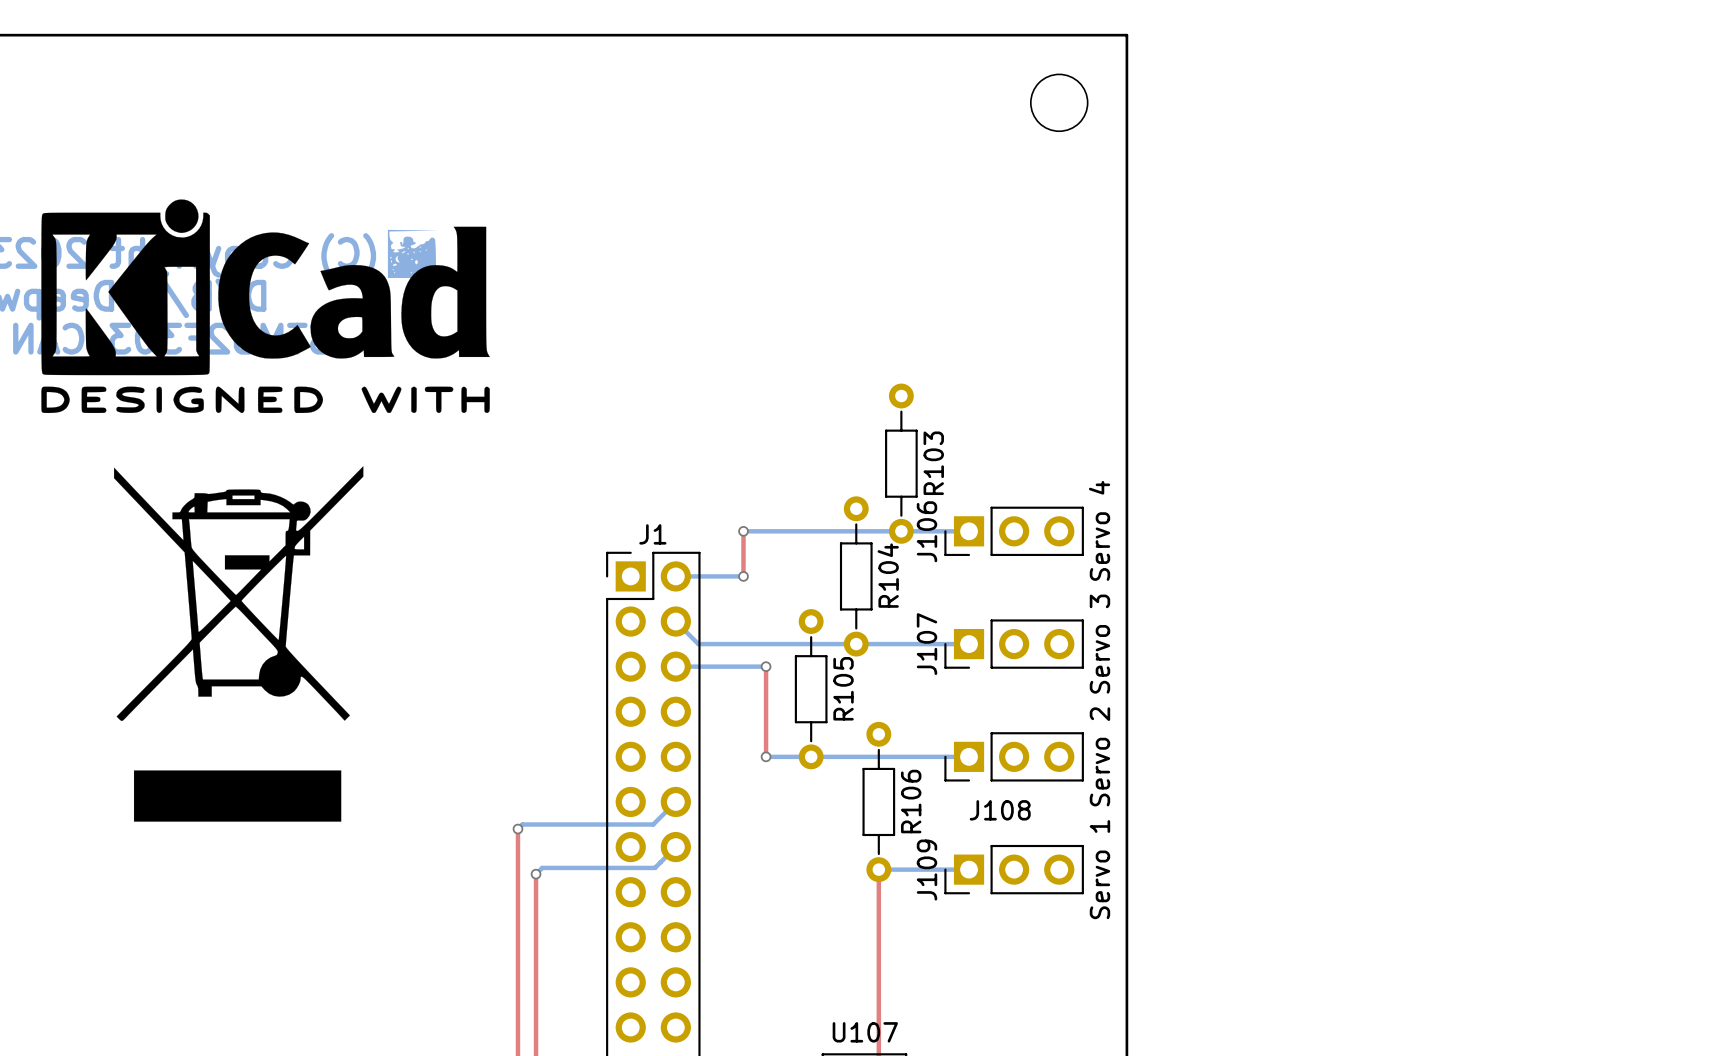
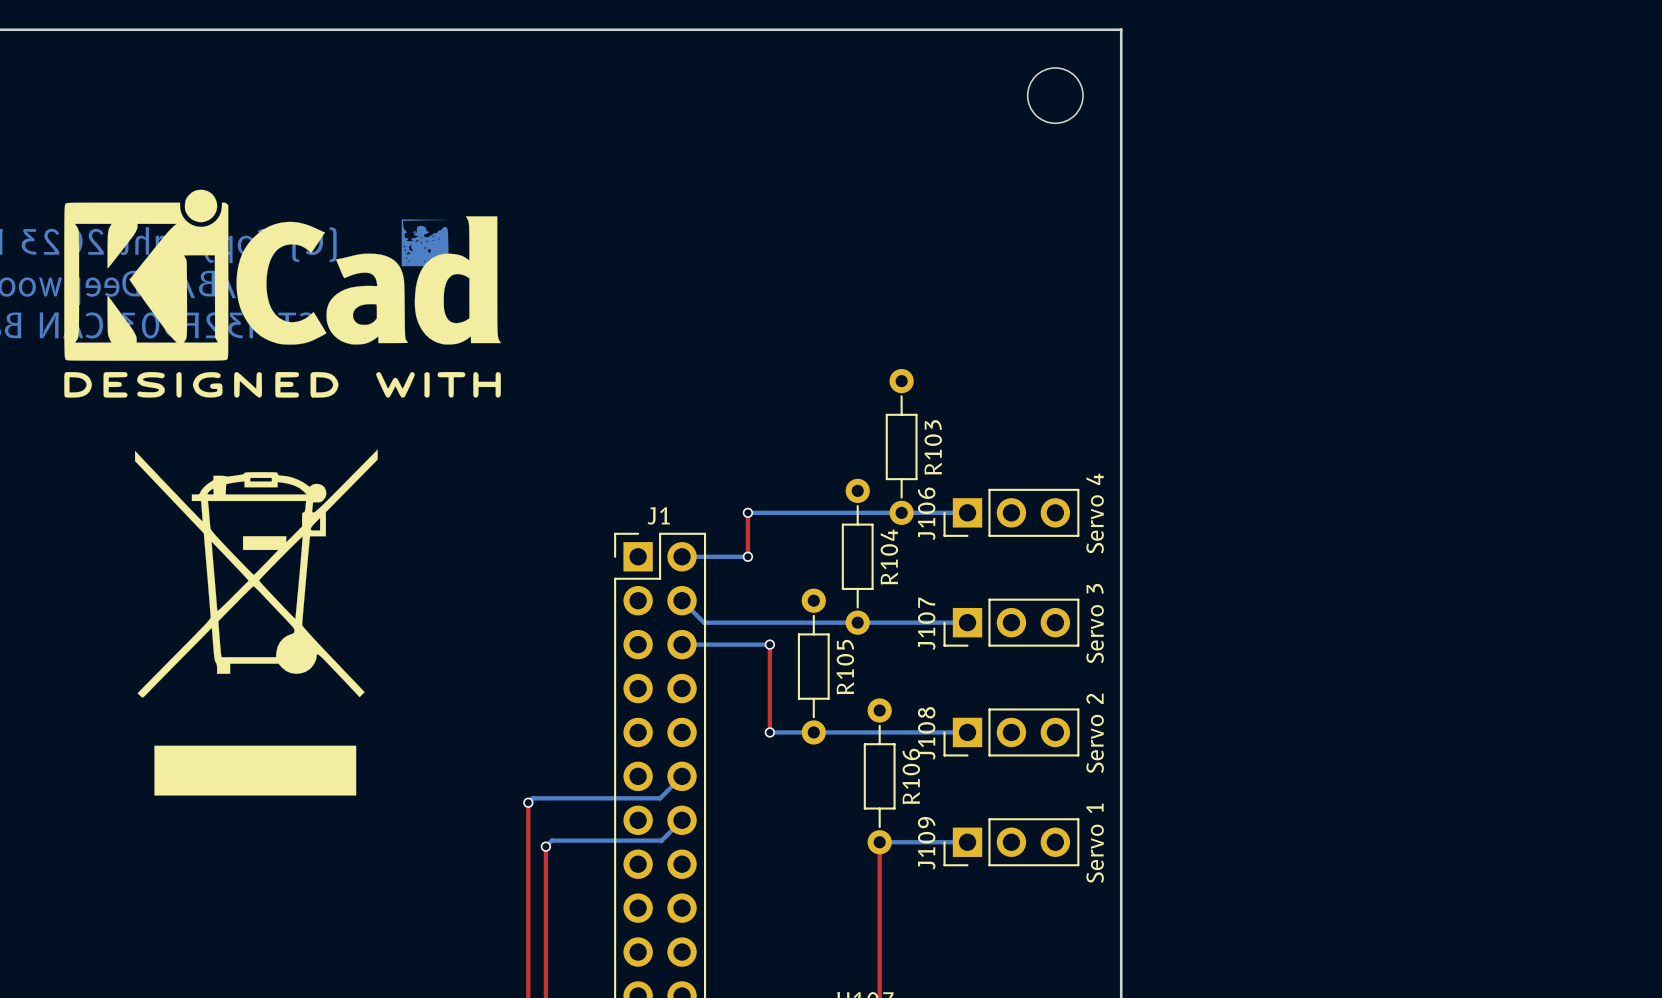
J108 name rotation: 0° (1000, 810) -> 90° counterclockwise (926, 733)
J108 name position: J108 (1000, 810) -> J108 (926, 733)

